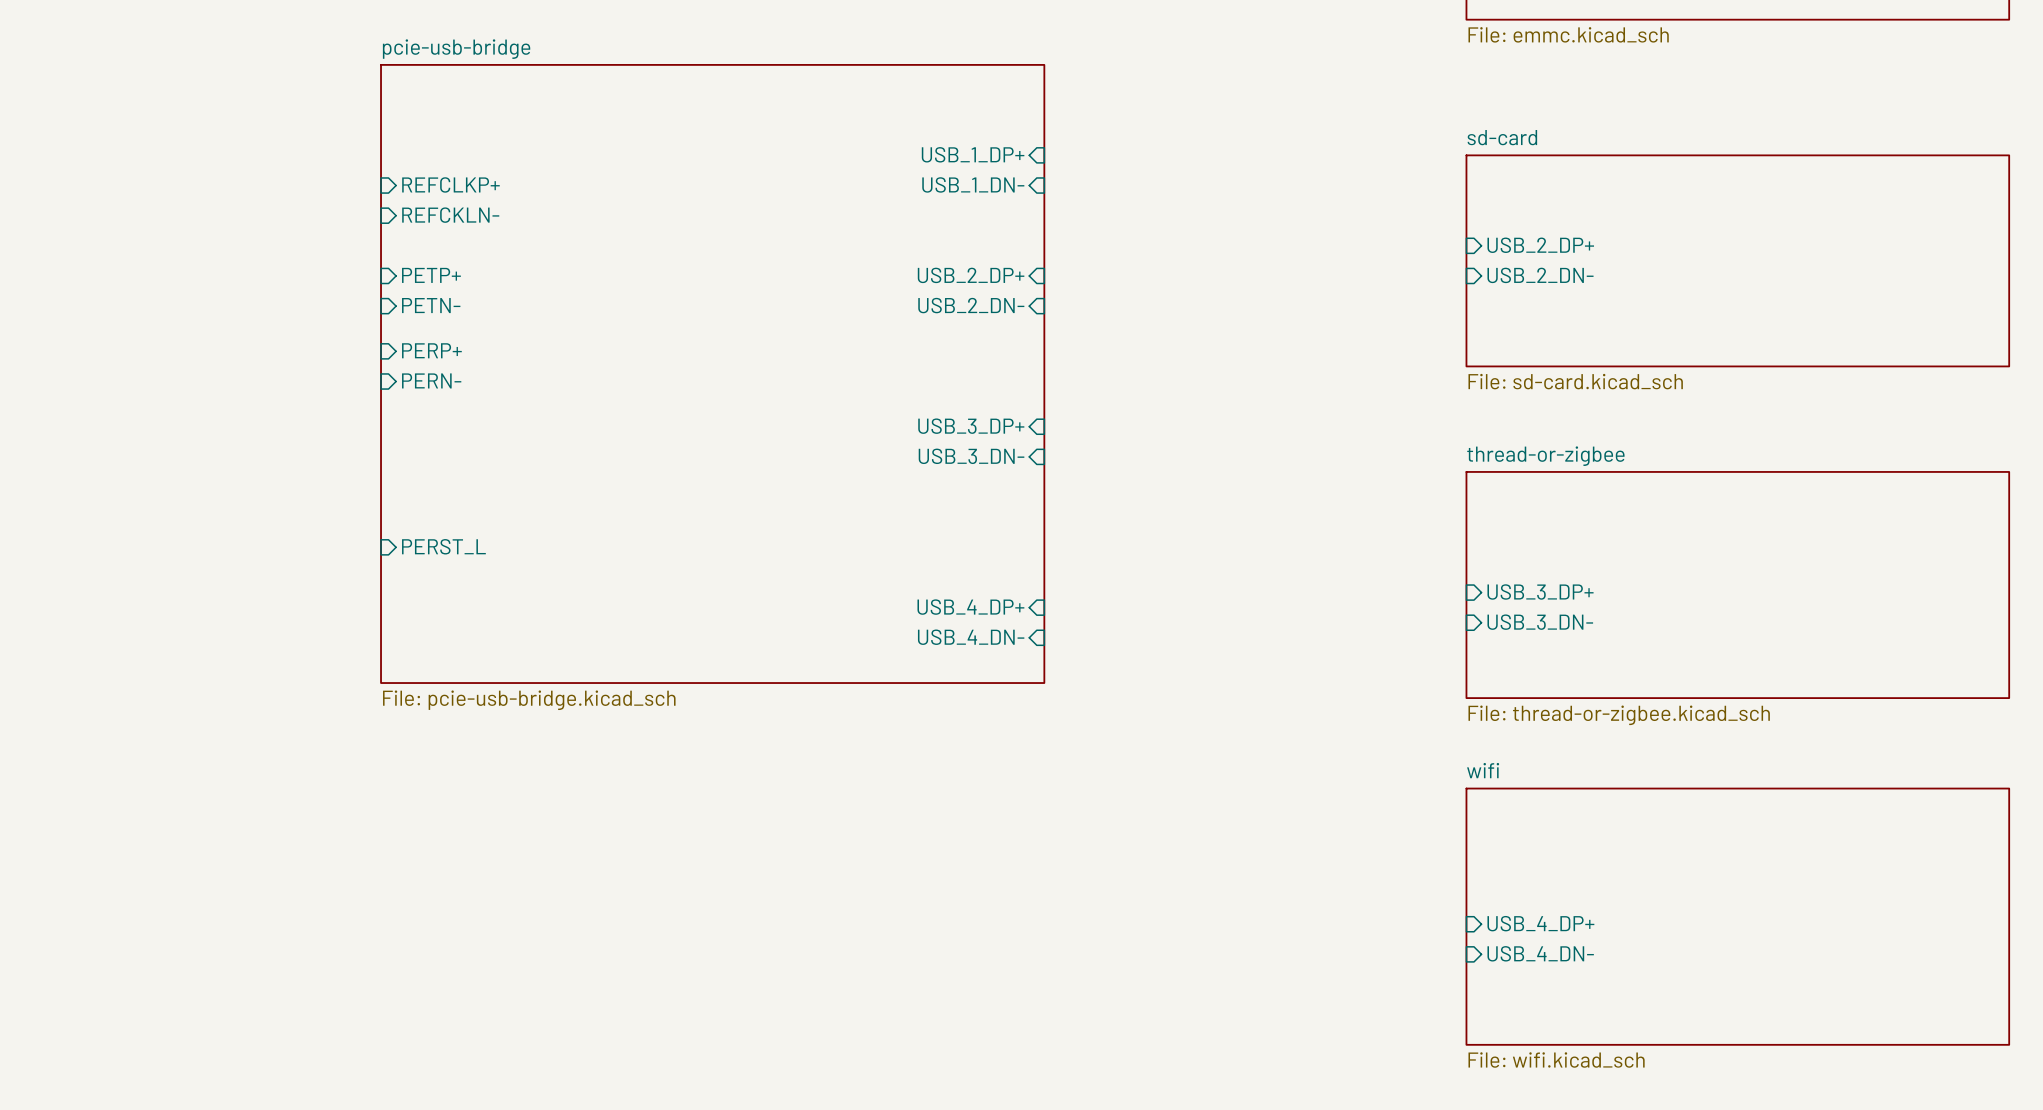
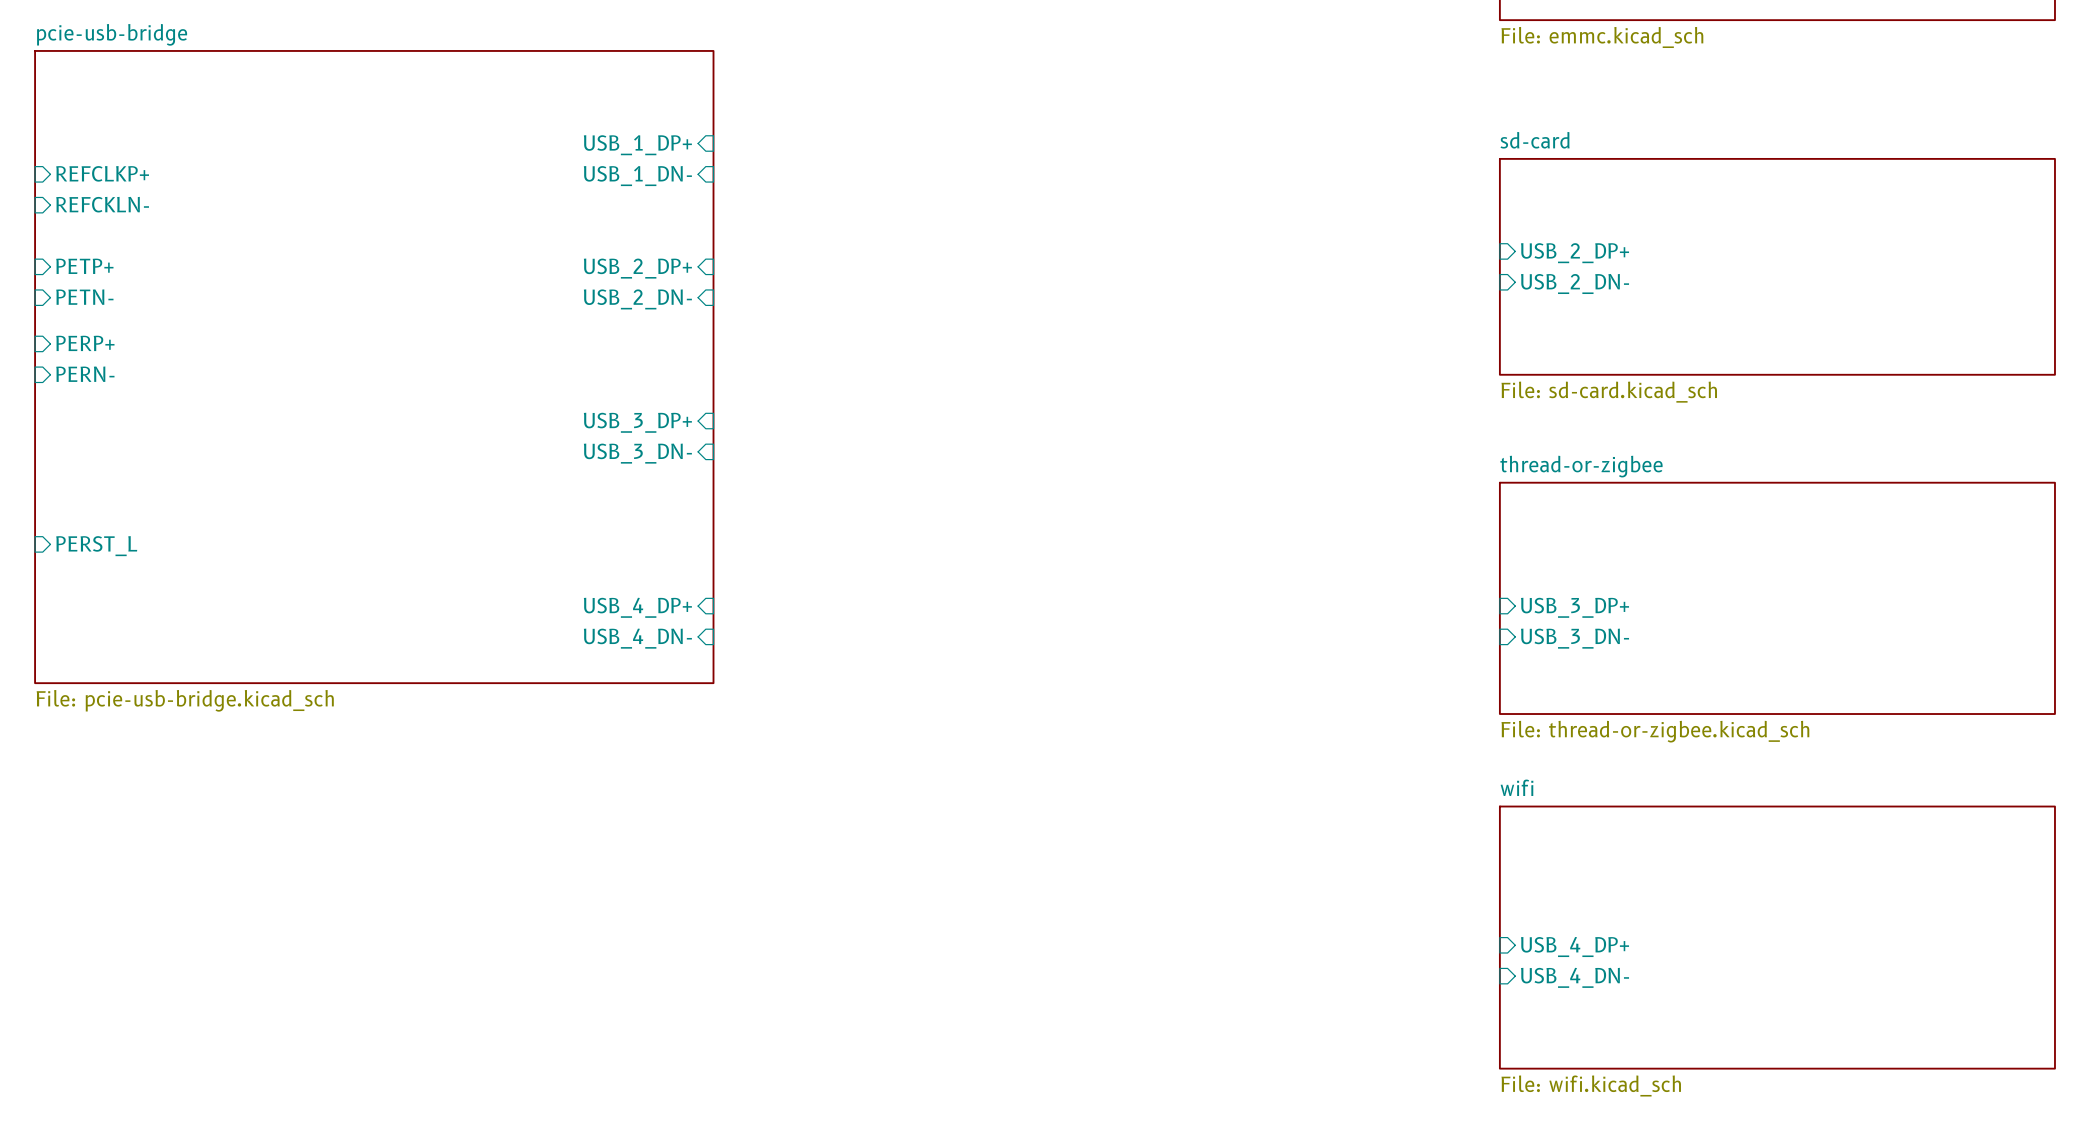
sheet pin: none -> USB_1_DP+ (637, 145)
sheet pin: USB_1_DP+ (973, 154) -> none
sheet pin: none -> REFCLKP+ (102, 173)
sheet pin: none -> USB_1_DN- (637, 176)
sheet pin: REFCLKP+ (450, 184) -> none
sheet pin: USB_1_DN- (973, 184) -> none
sheet pin: none -> REFCKLN- (102, 204)
sheet pin: REFCKLN- (450, 215) -> none
sheet pin: none -> PETP+ (84, 266)
sheet pin: none -> USB_2_DP+ (637, 268)
sheet pin: PETP+ (431, 275) -> none
sheet pin: USB_2_DP+ (971, 275) -> none
sheet pin: none -> PETN- (84, 297)
sheet pin: none -> USB_2_DN- (637, 299)
sheet pin: PETN- (431, 305) -> none
sheet pin: USB_2_DN- (971, 305) -> none
sheet pin: none -> PERP+ (85, 343)
sheet pin: PERP+ (431, 350) -> none
sheet pcie-usb-bridge: none -> File: pcie-usb-bridge.kicad_sch (374, 367)
sheet pin: none -> PERN- (85, 374)
sheet pcie-usb-bridge: File: pcie-usb-bridge.kicad_sch (712, 373) -> none
sheet pin: PERN- (431, 380) -> none
sheet pin: none -> USB_3_DP+ (637, 422)
sheet pin: USB_3_DP+ (971, 426) -> none
sheet pin: none -> USB_3_DN- (637, 453)
sheet pin: USB_3_DN- (971, 456) -> none
sheet pin: none -> PERST_L (96, 546)
sheet pin: PERST_L (443, 546) -> none
sheet pin: none -> USB_4_DP+ (637, 607)
sheet pin: USB_4_DP+ (970, 607) -> none
sheet pin: none -> USB_4_DN- (637, 638)
sheet pin: USB_4_DN- (971, 637) -> none

